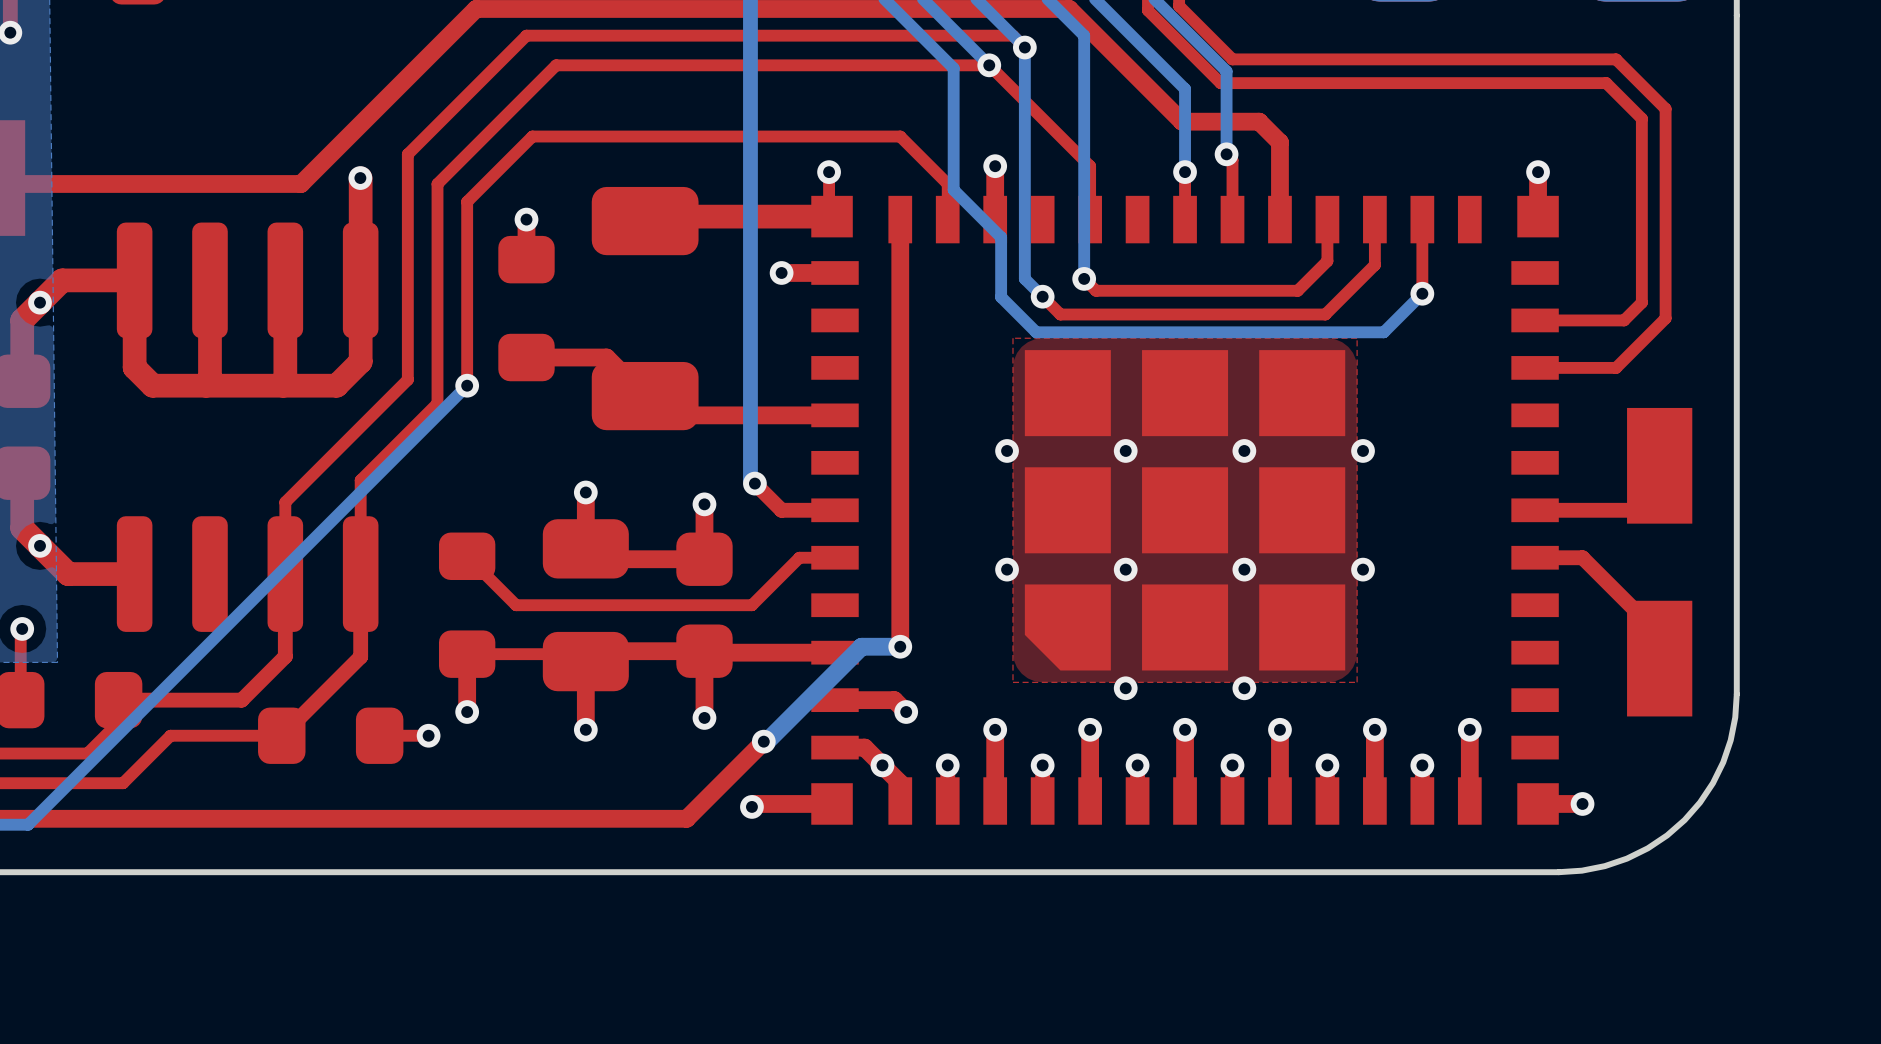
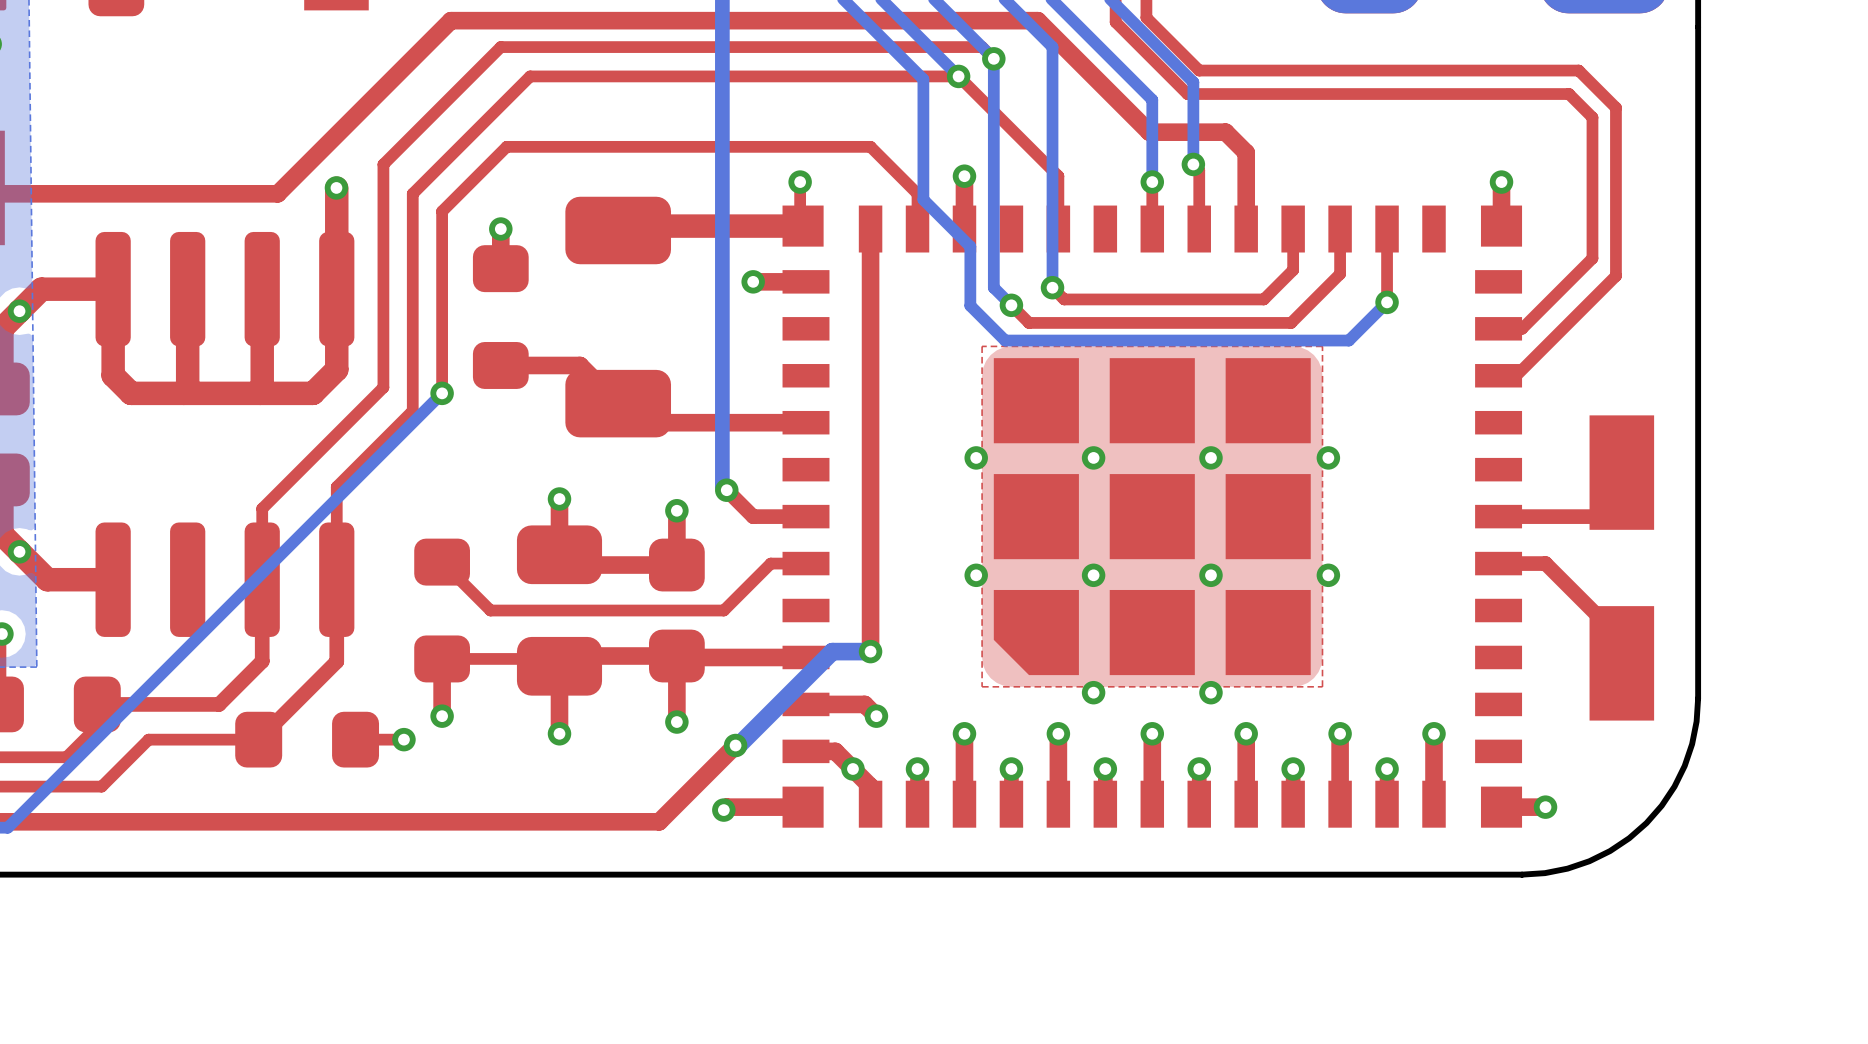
top track: (1653, 97) (1665, 108) (1665, 318) (1616, 367) (1552, 367) -> (1615, 107) (1615, 275) (1516, 375)
top track: (1630, 106) (1641, 118) (1641, 302) (1624, 320) (1558, 320) -> (1592, 117) (1592, 258) (1522, 328)

